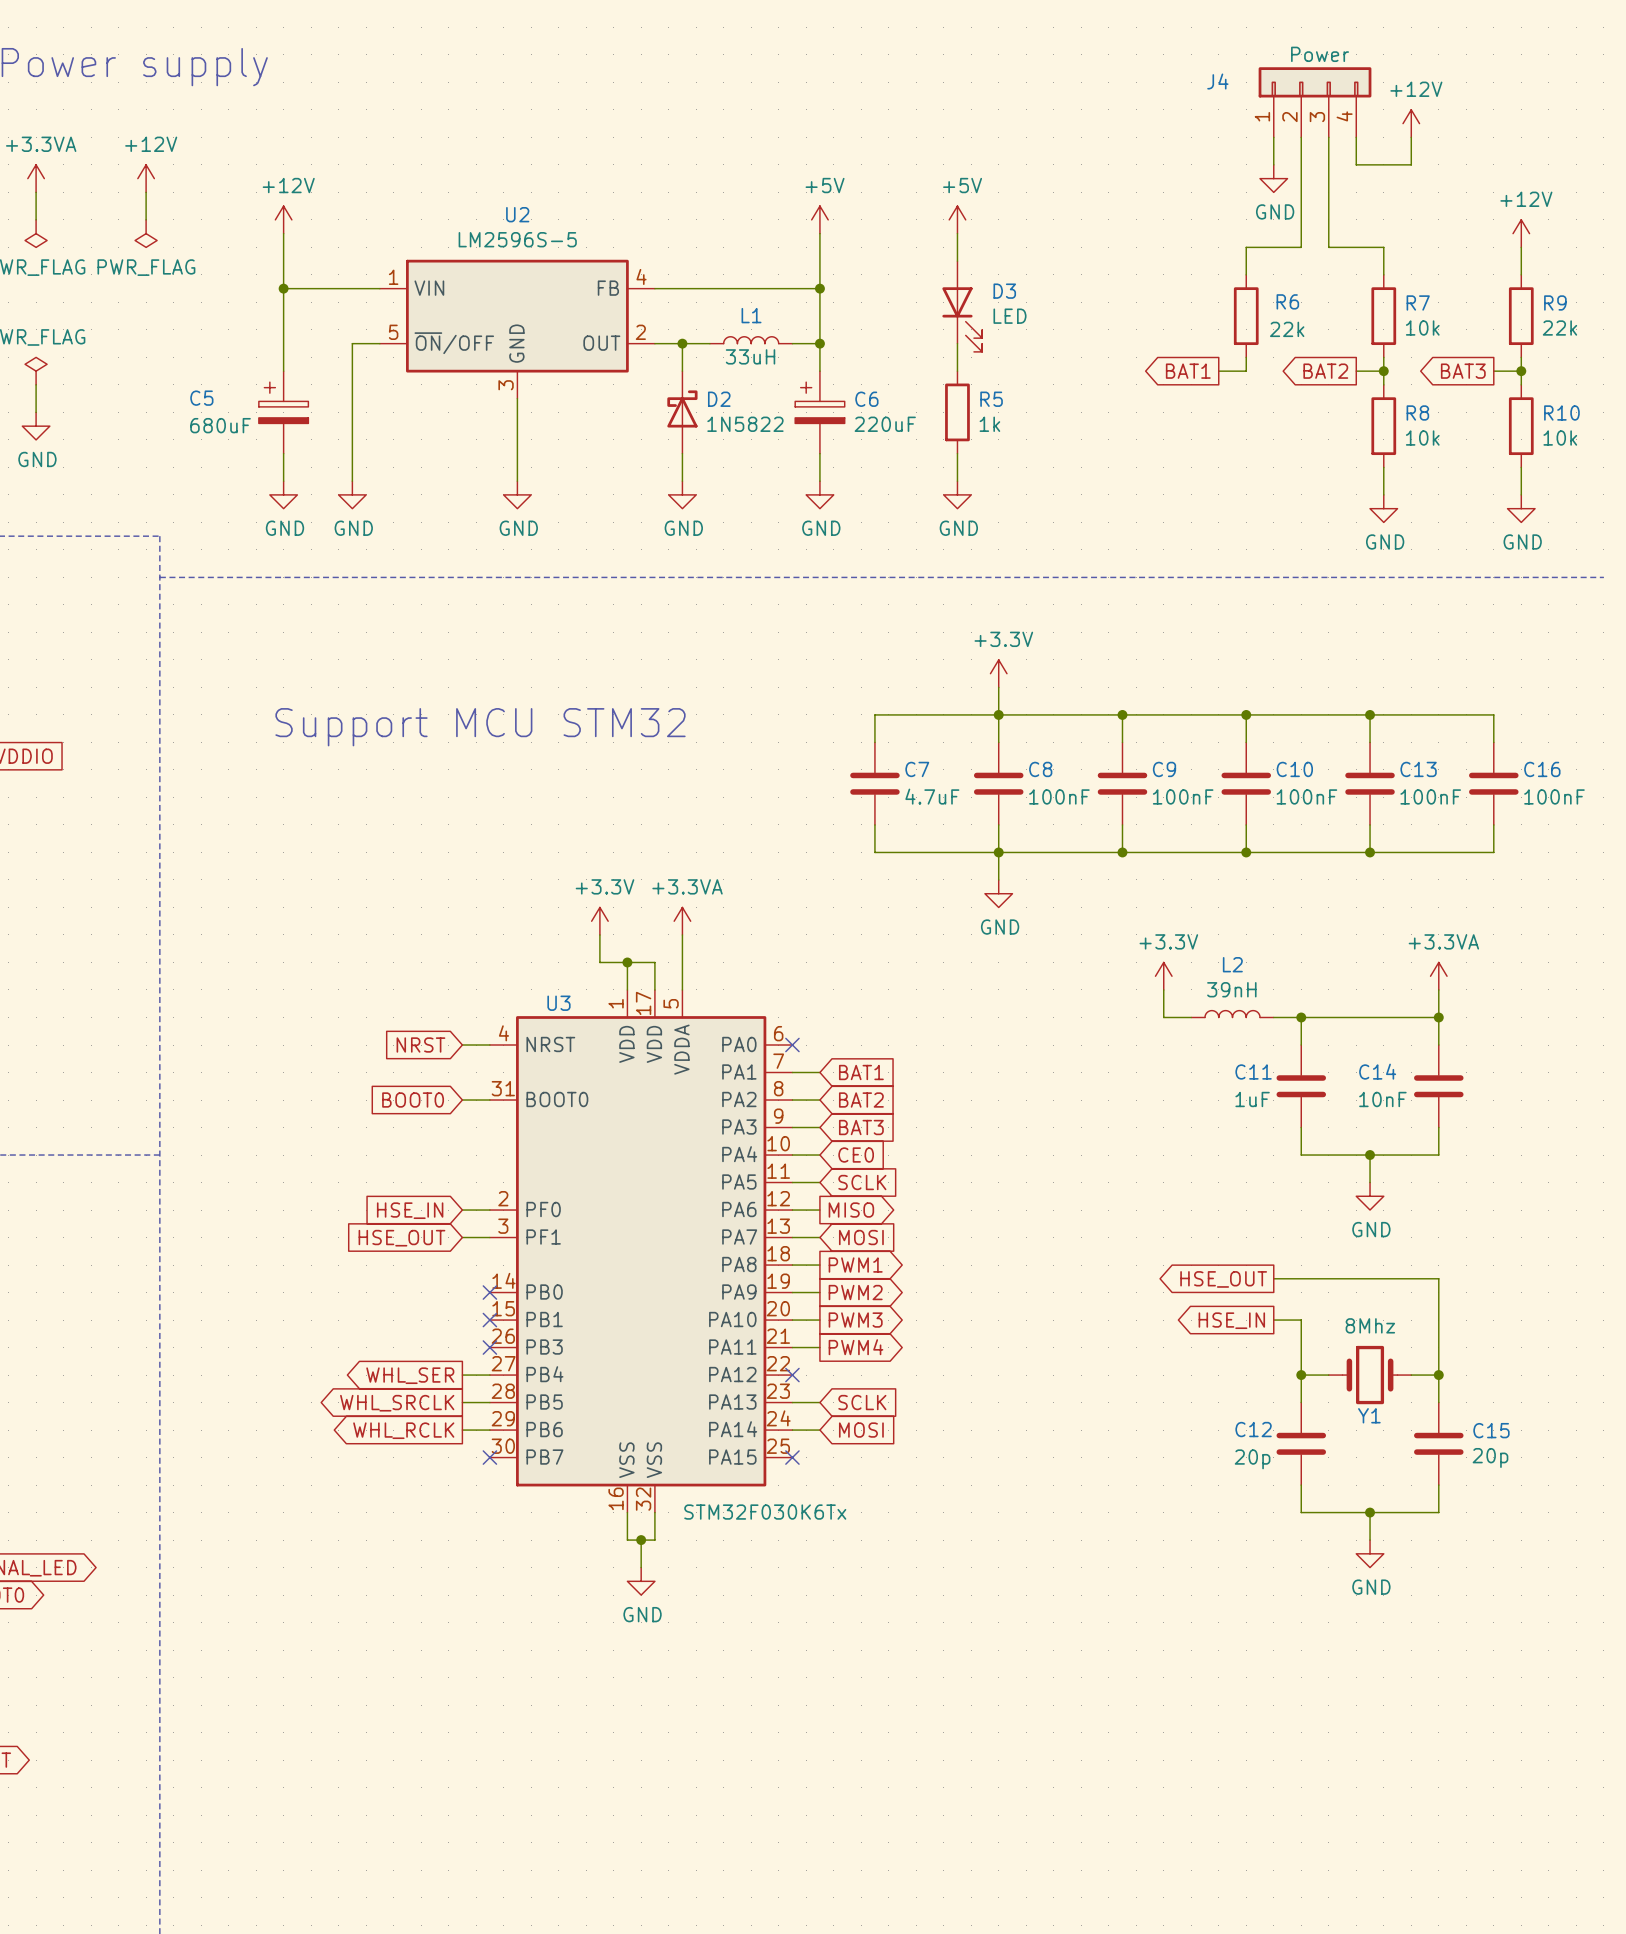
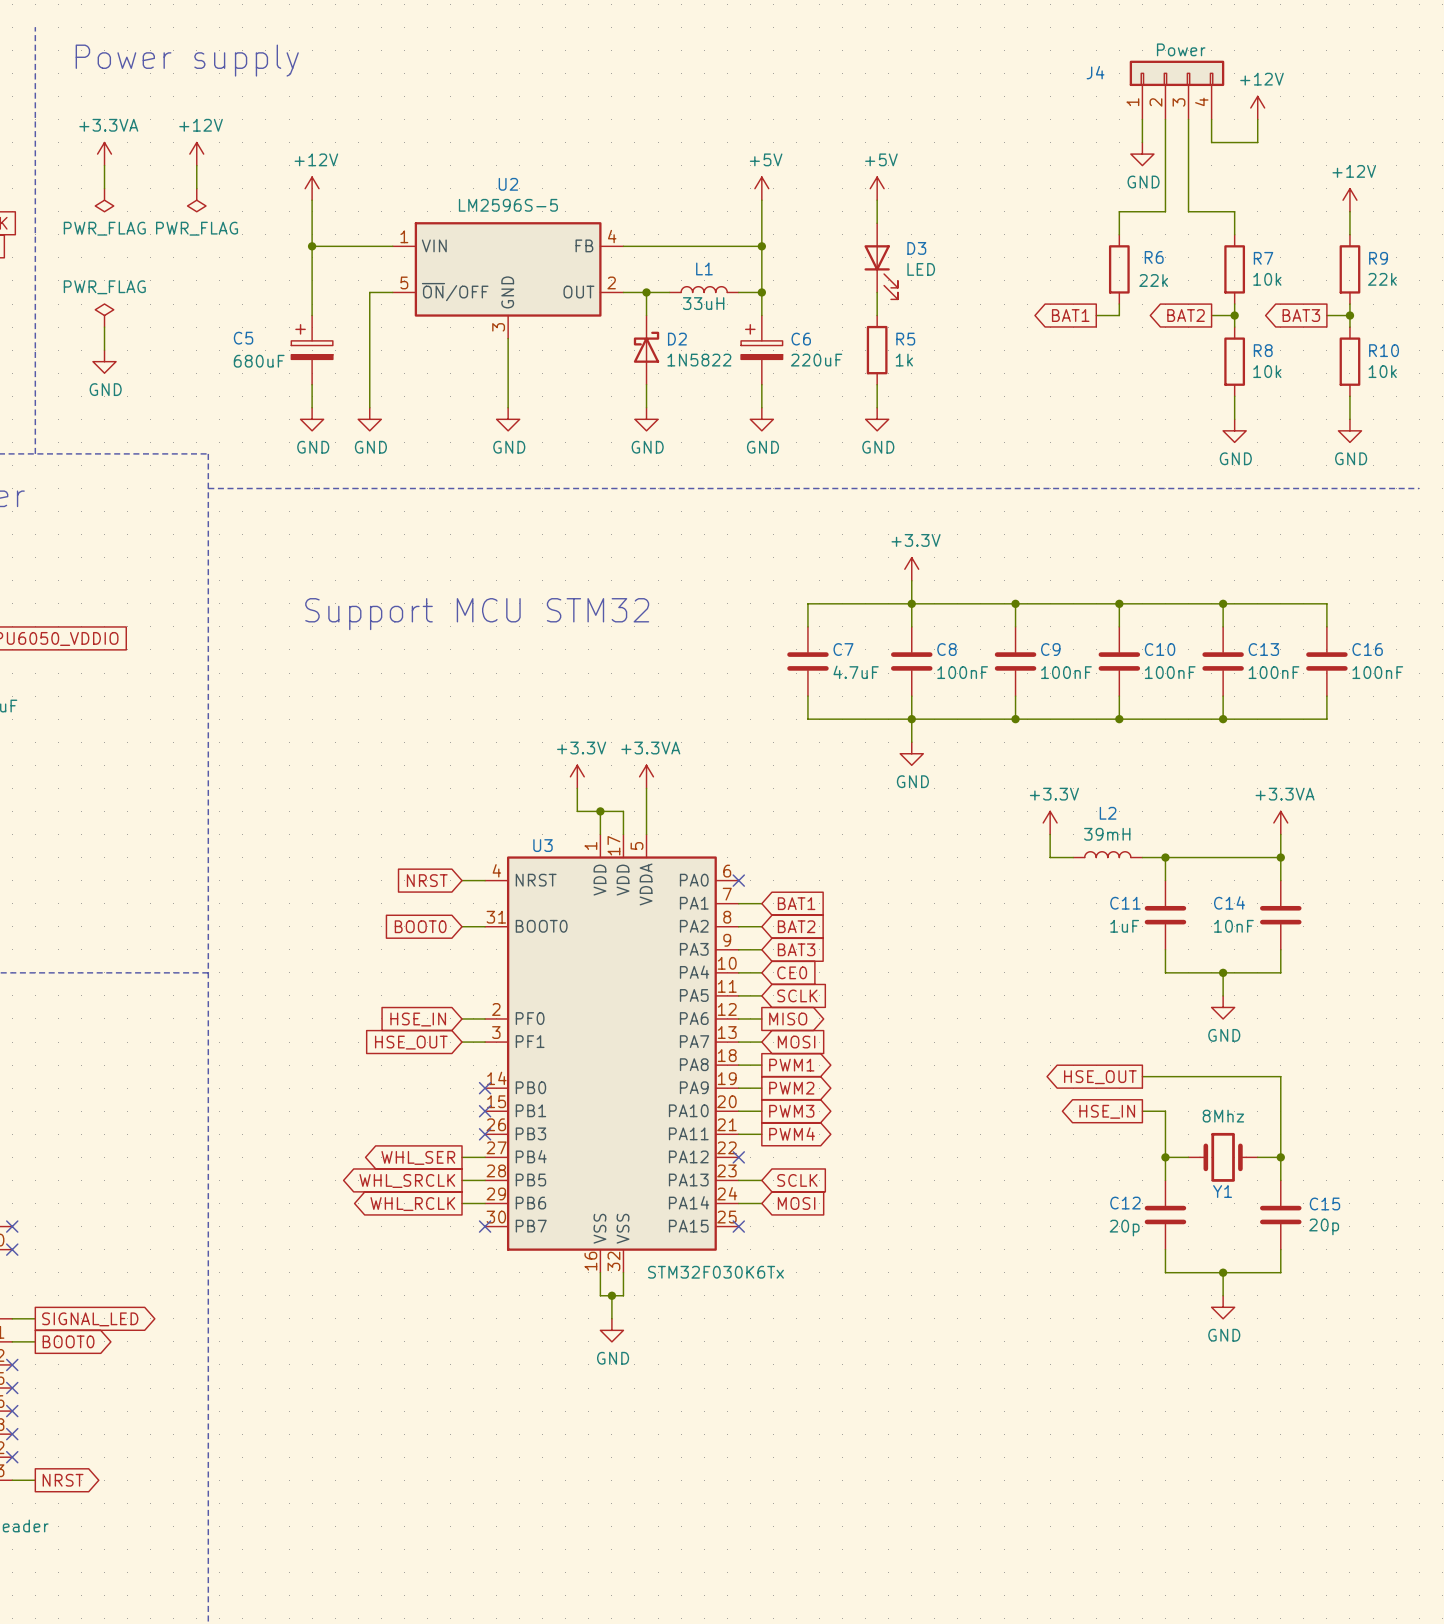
L2 value: 39nH (1231, 989) -> 39mH (1107, 834)

